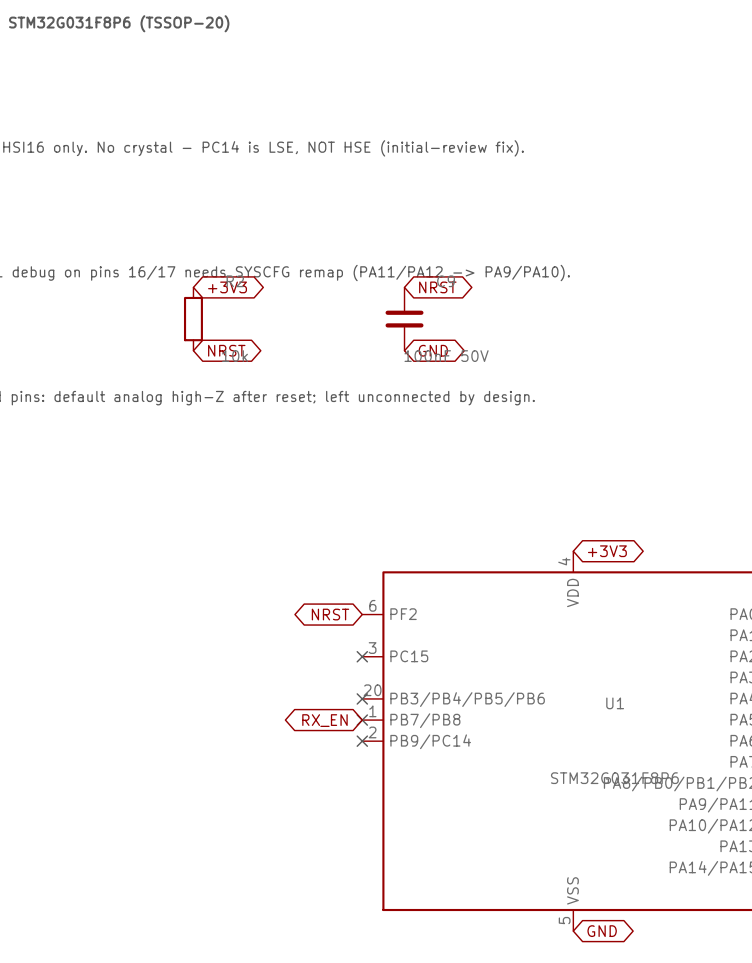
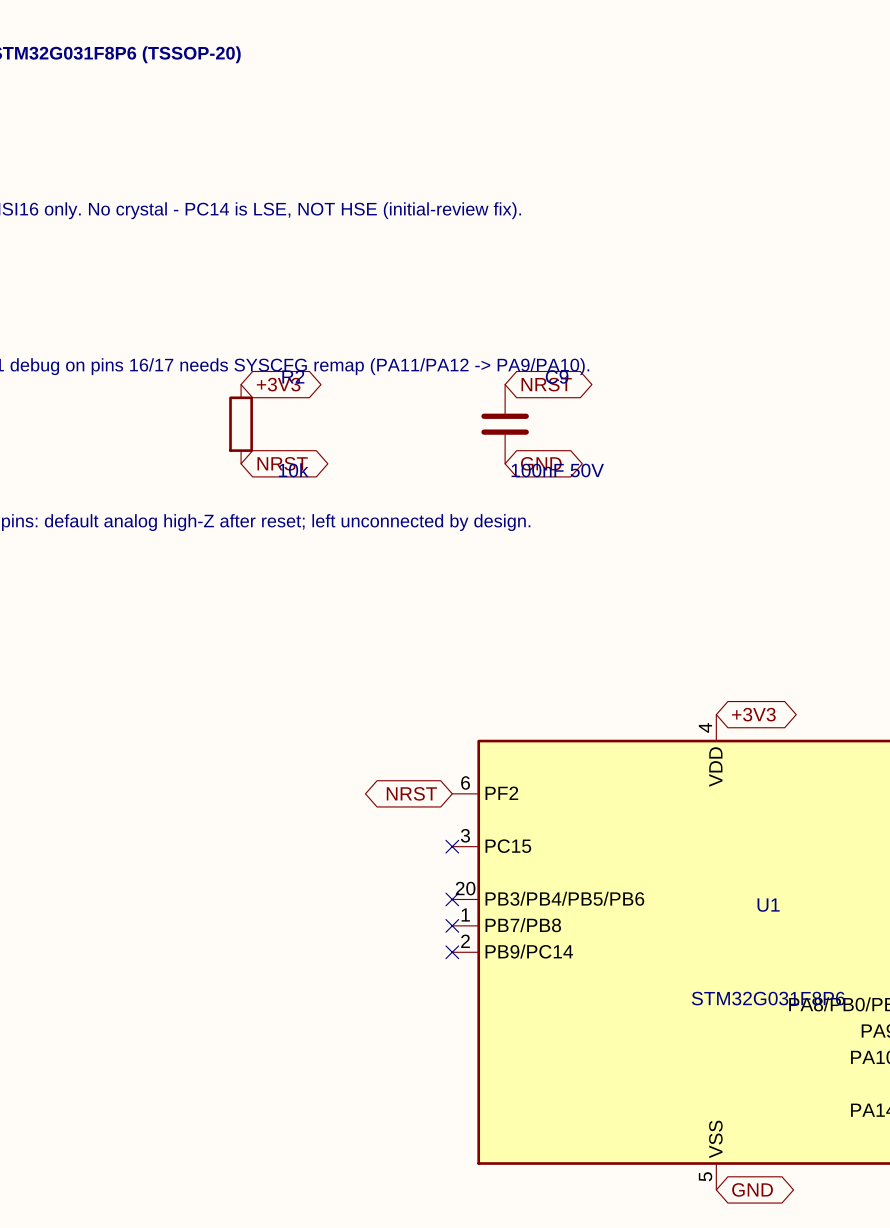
global label: RX_EN (324, 720) -> none

